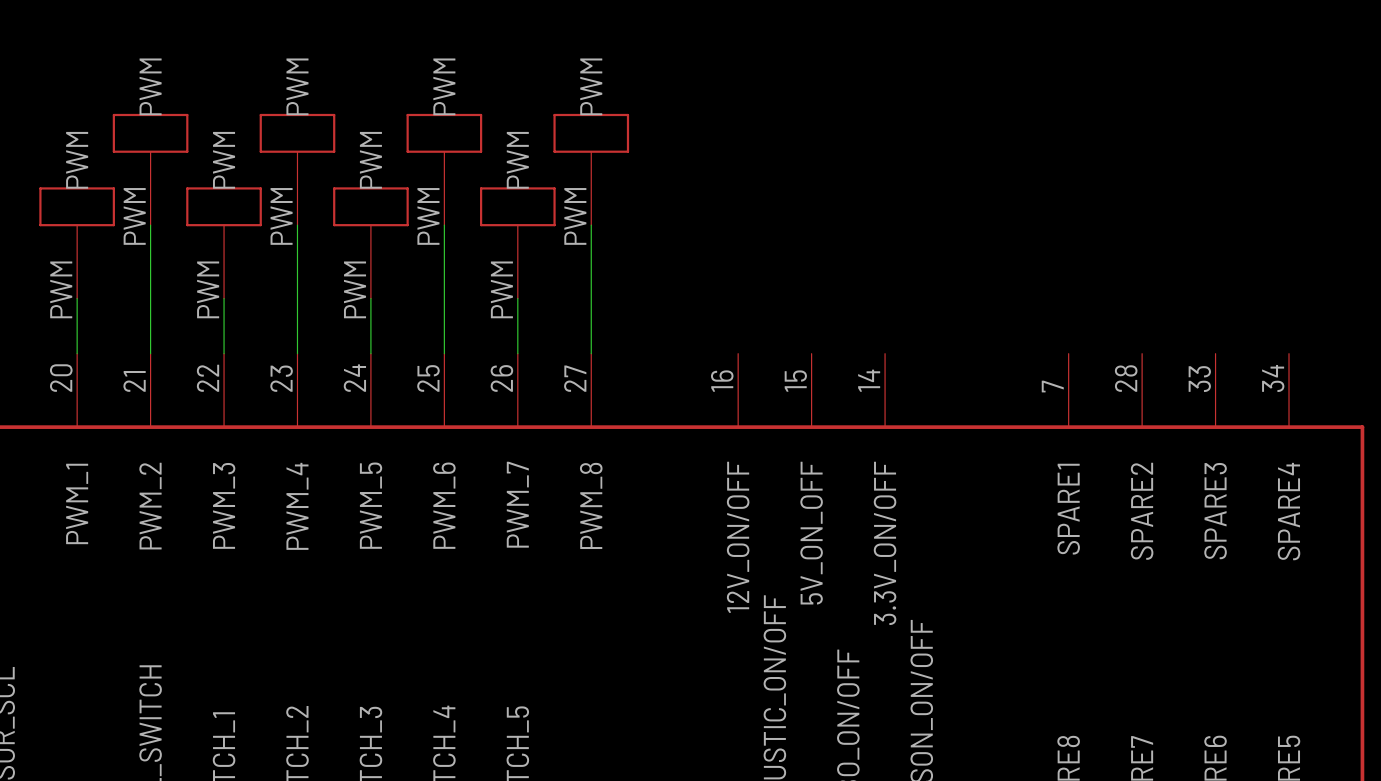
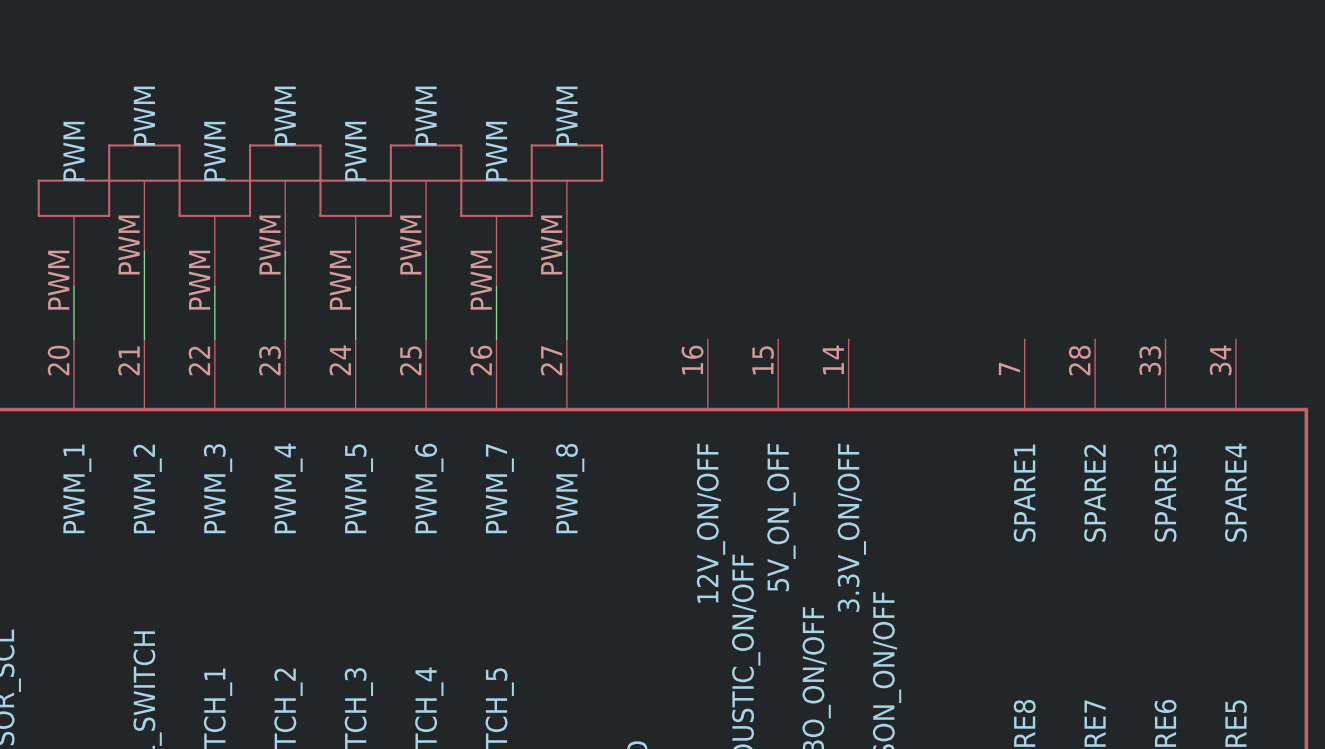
part position: (150, 169) -> (144, 197)
part position: (297, 169) -> (285, 197)
part position: (444, 169) -> (426, 197)
part position: (591, 169) -> (566, 197)

